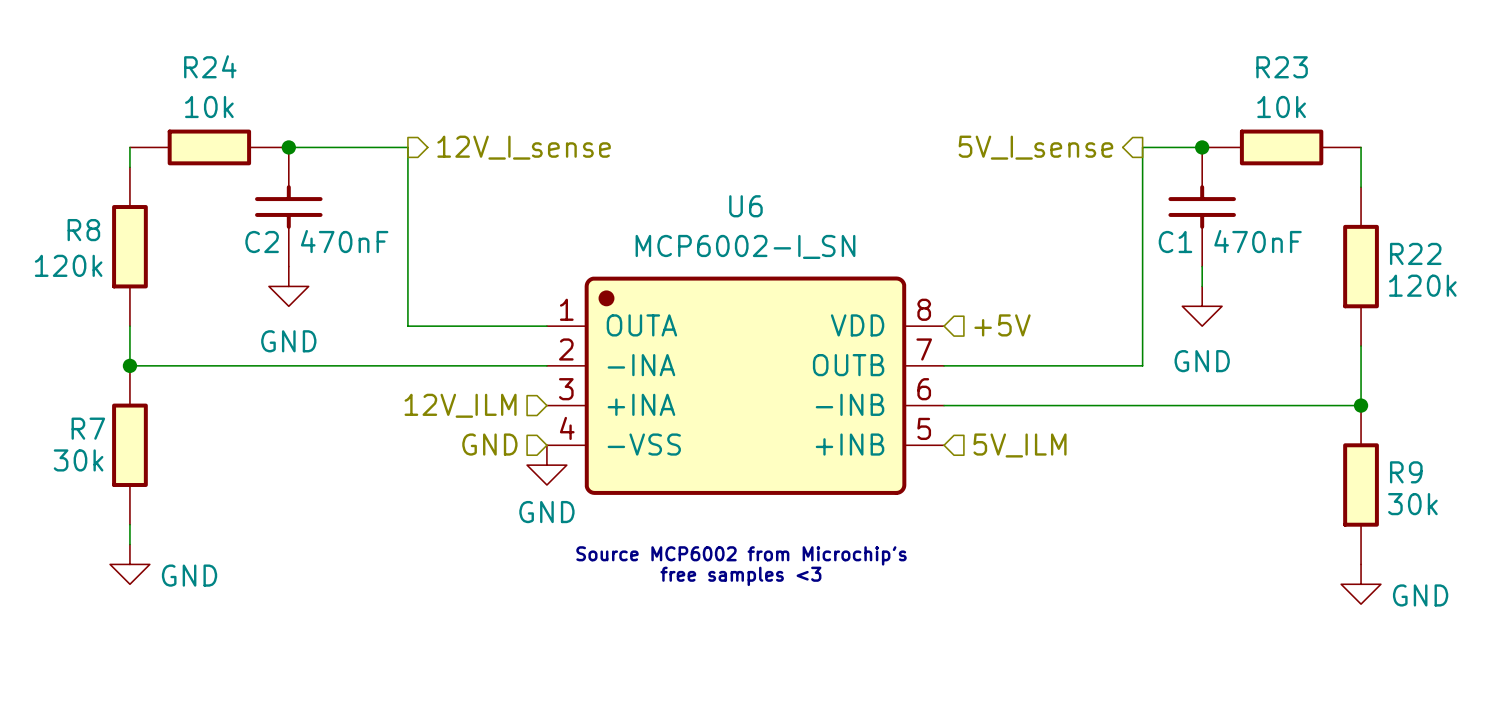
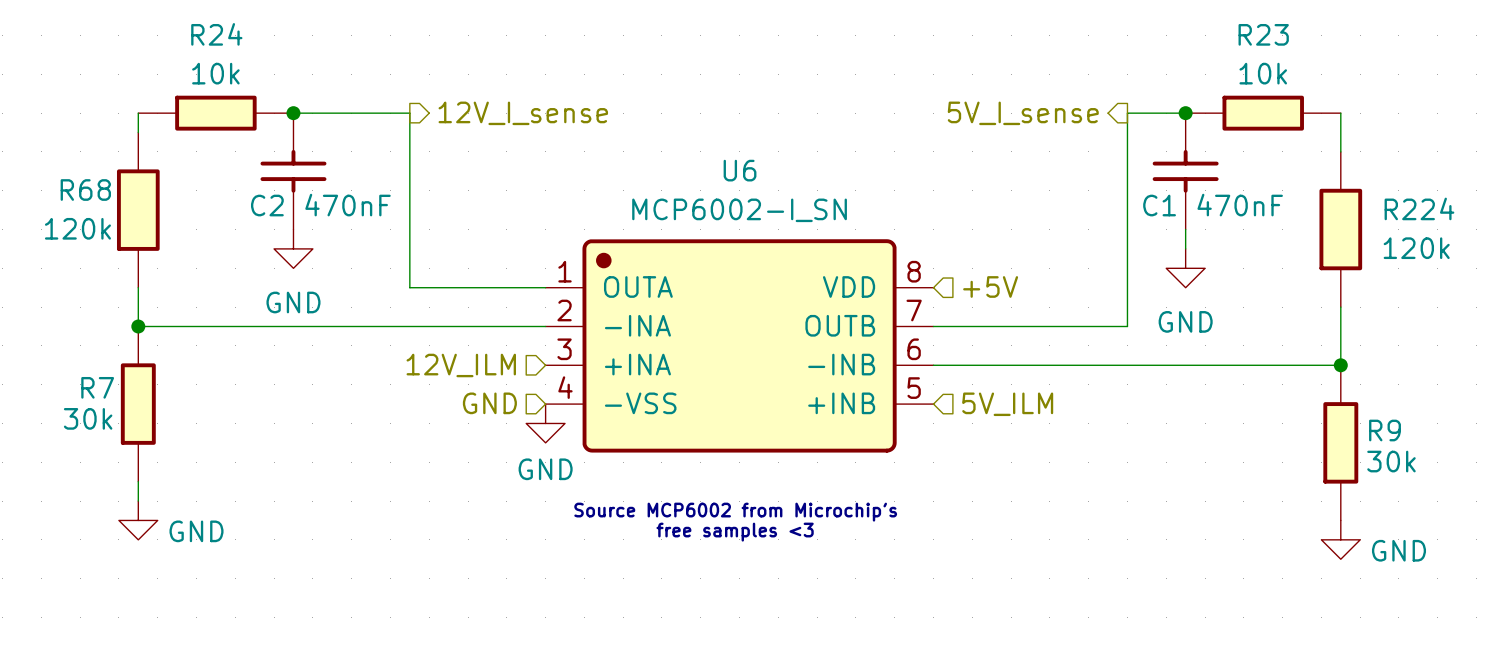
R8: 120k (129, 246) -> none
R68: none -> 120k (138, 210)
R22: 120k (1361, 266) -> none
R224: none -> 120k (1340, 229)

